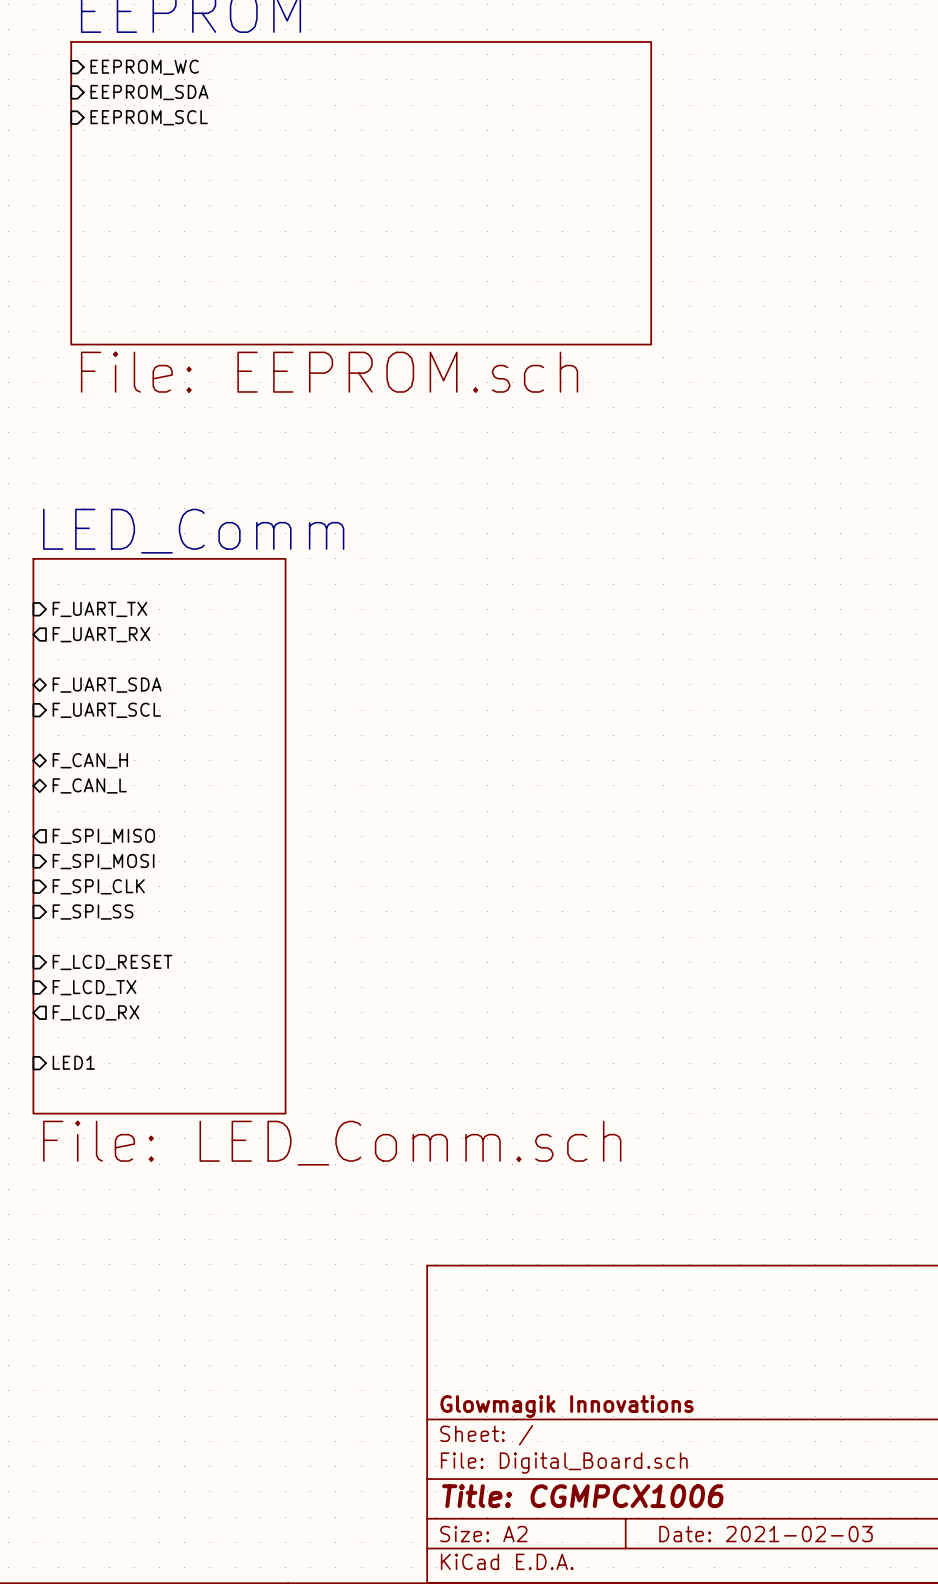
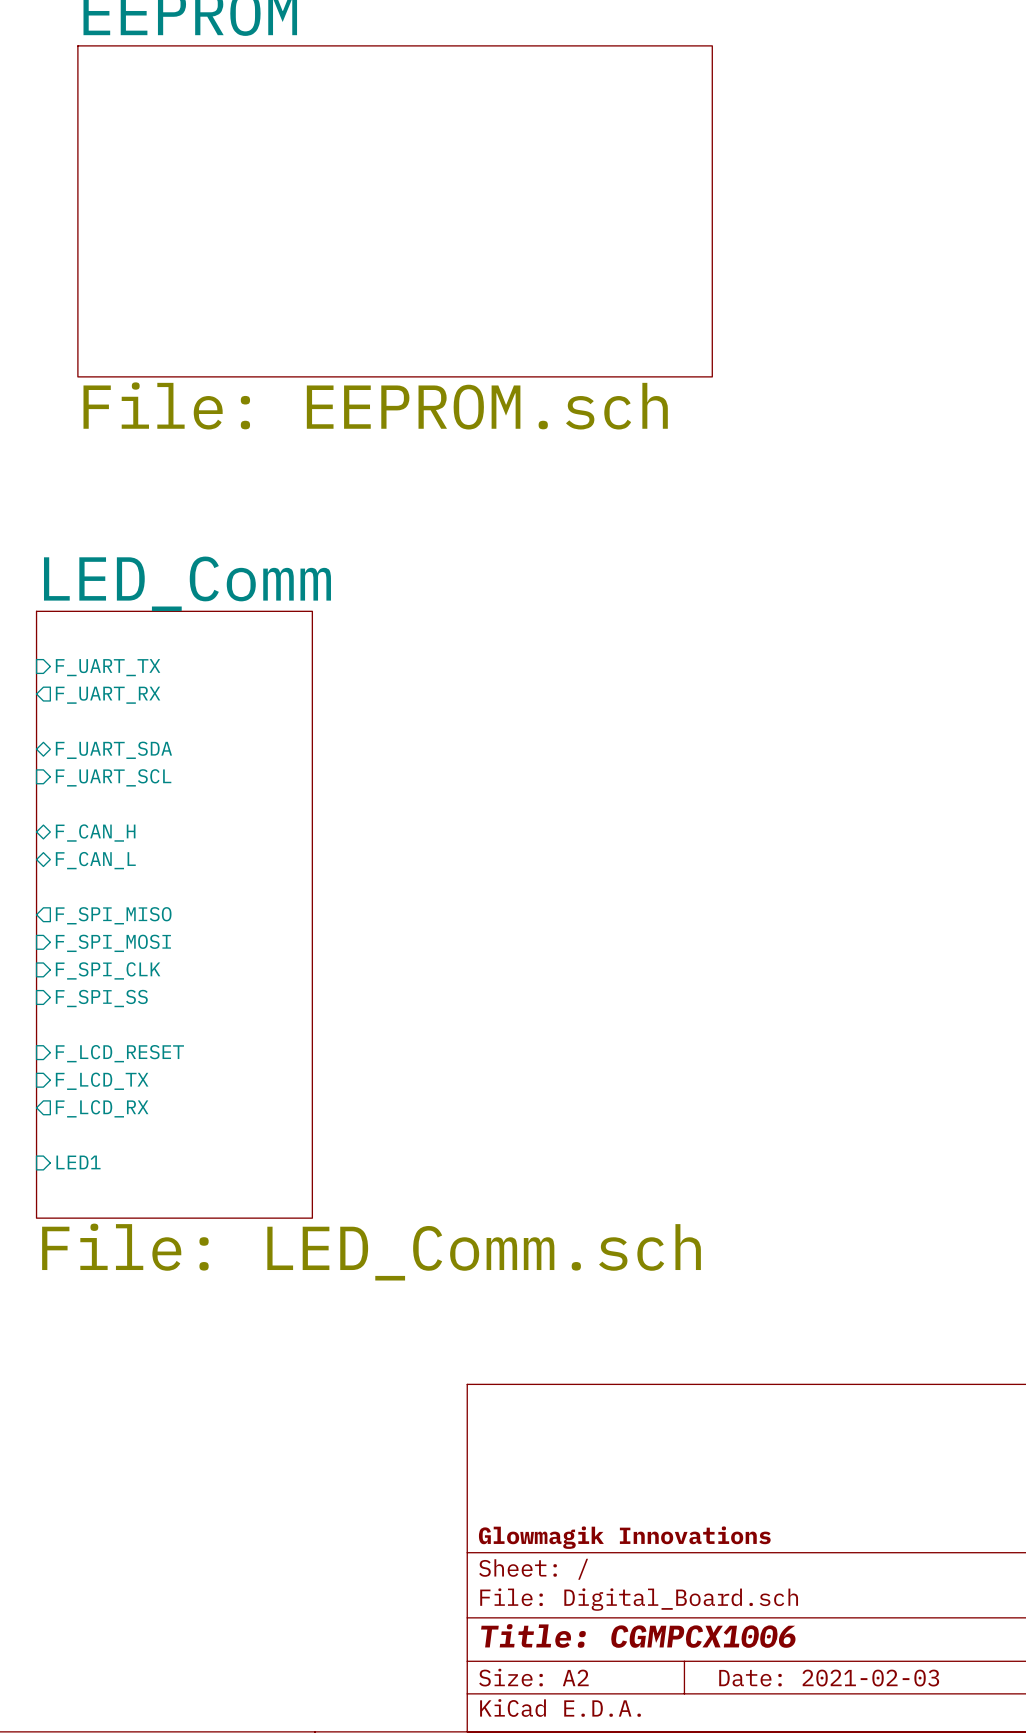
sheet pin: EEPROM_WC (144, 67) -> none
sheet pin: EEPROM_SDA (149, 92) -> none
sheet pin: EEPROM_SCL (149, 117) -> none

